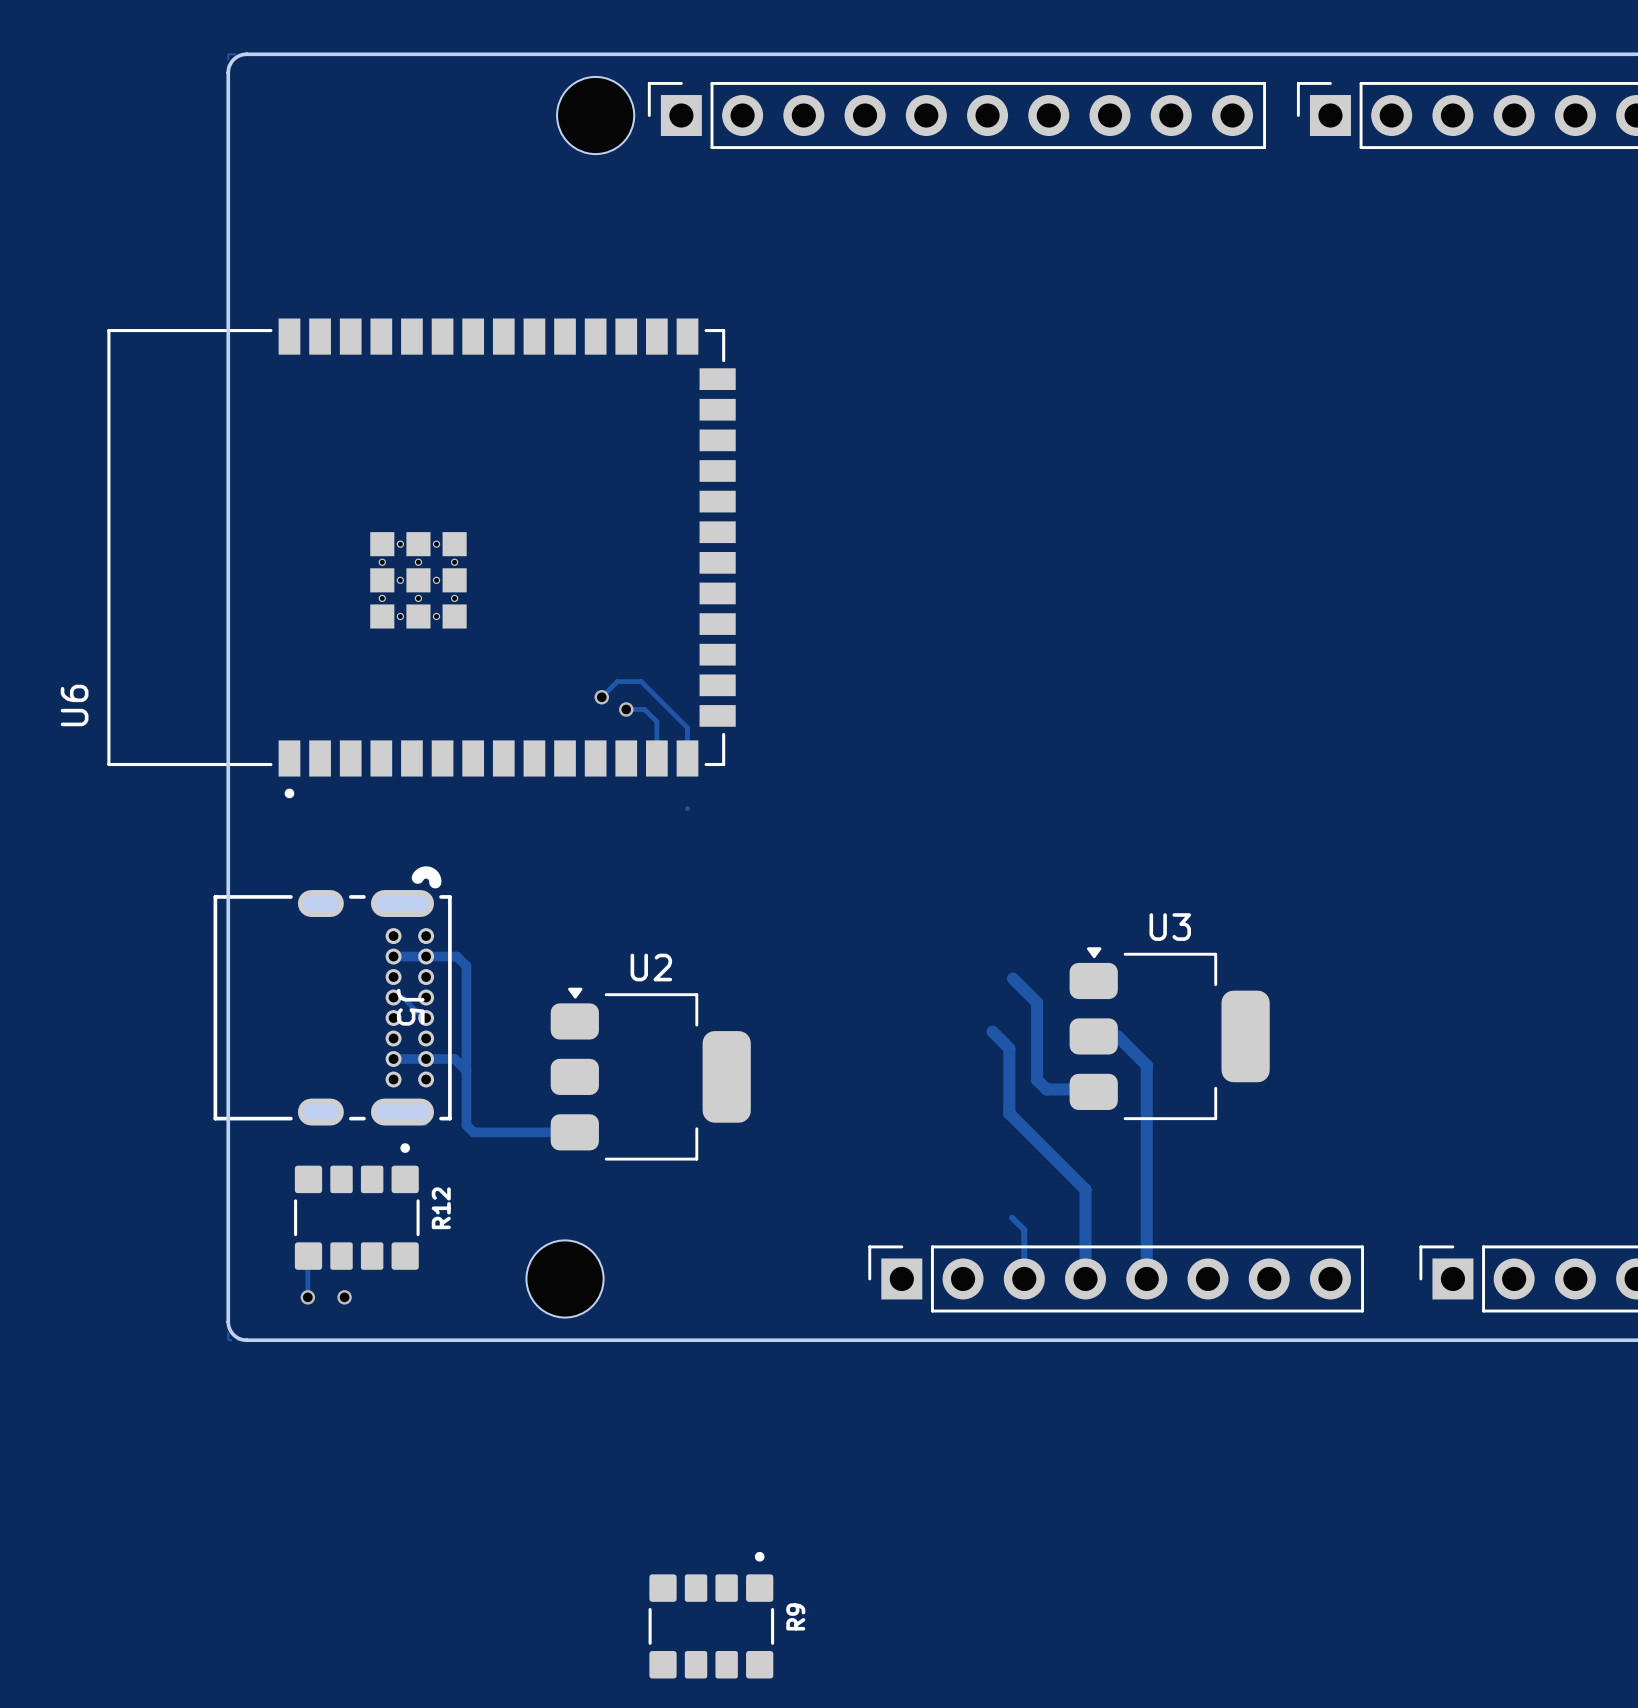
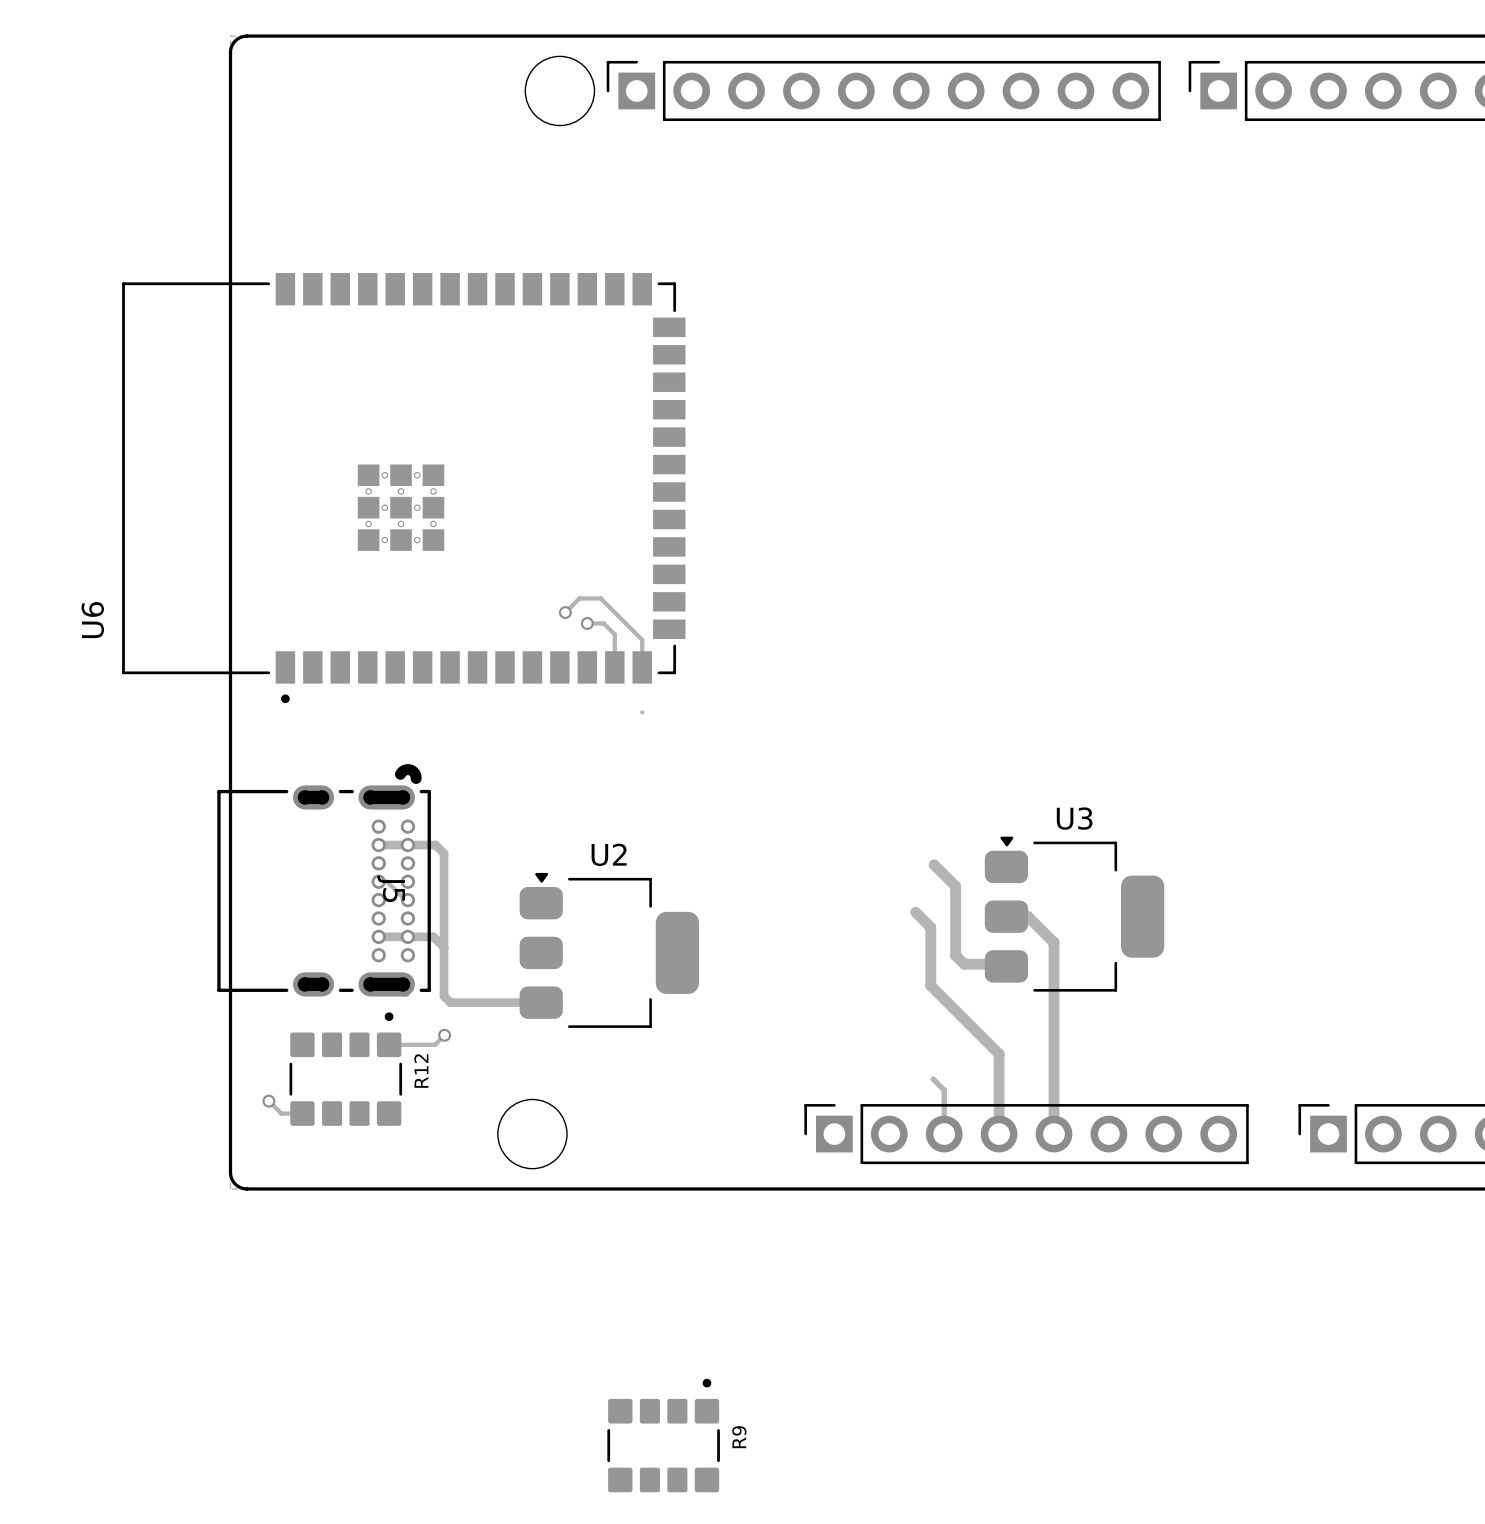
track: none -> (444, 1035) (435, 1044) (390, 1044)
via: none -> (444, 1035)
via: none -> (268, 1101)
track: (310, 1256) (307, 1258) (307, 1297) -> (303, 1113) (281, 1113) (268, 1101)
via: (307, 1297) -> none
via: (344, 1297) -> none

